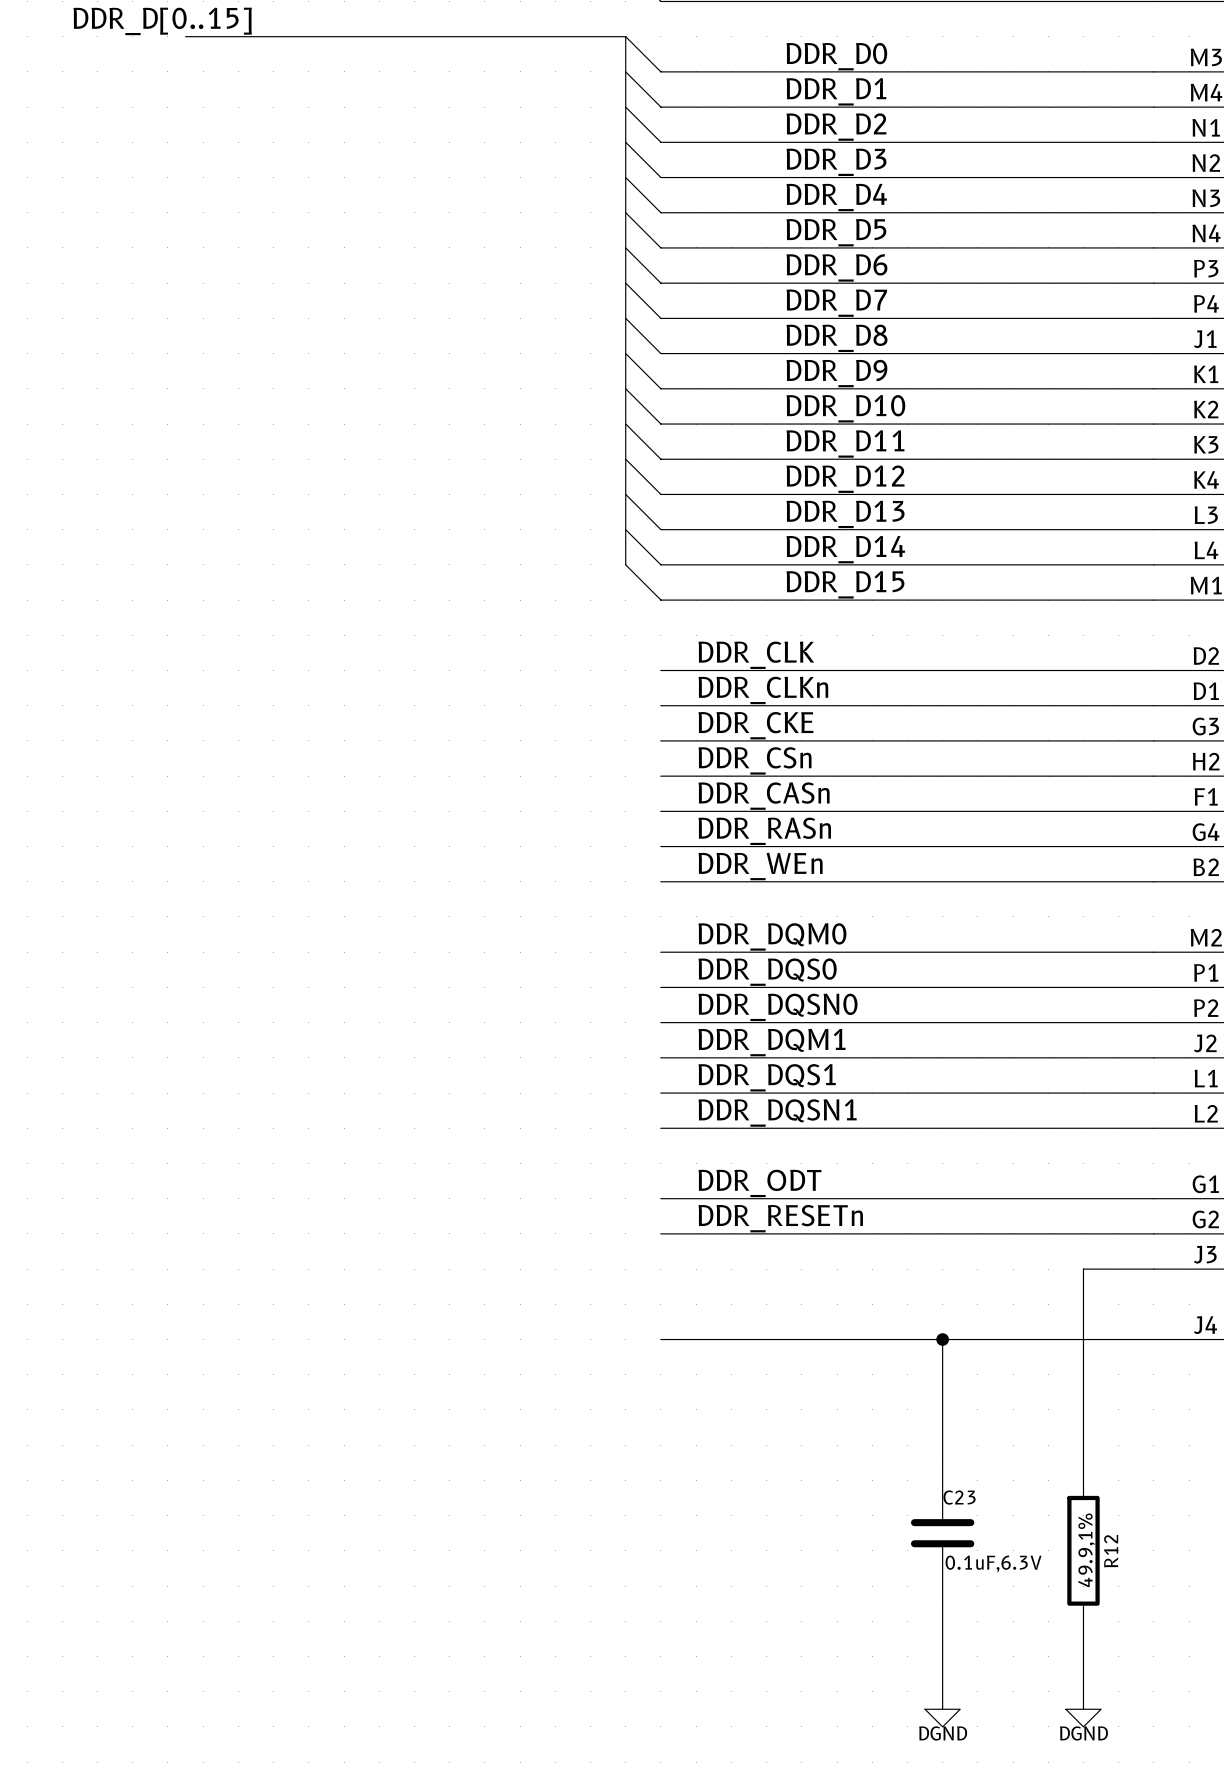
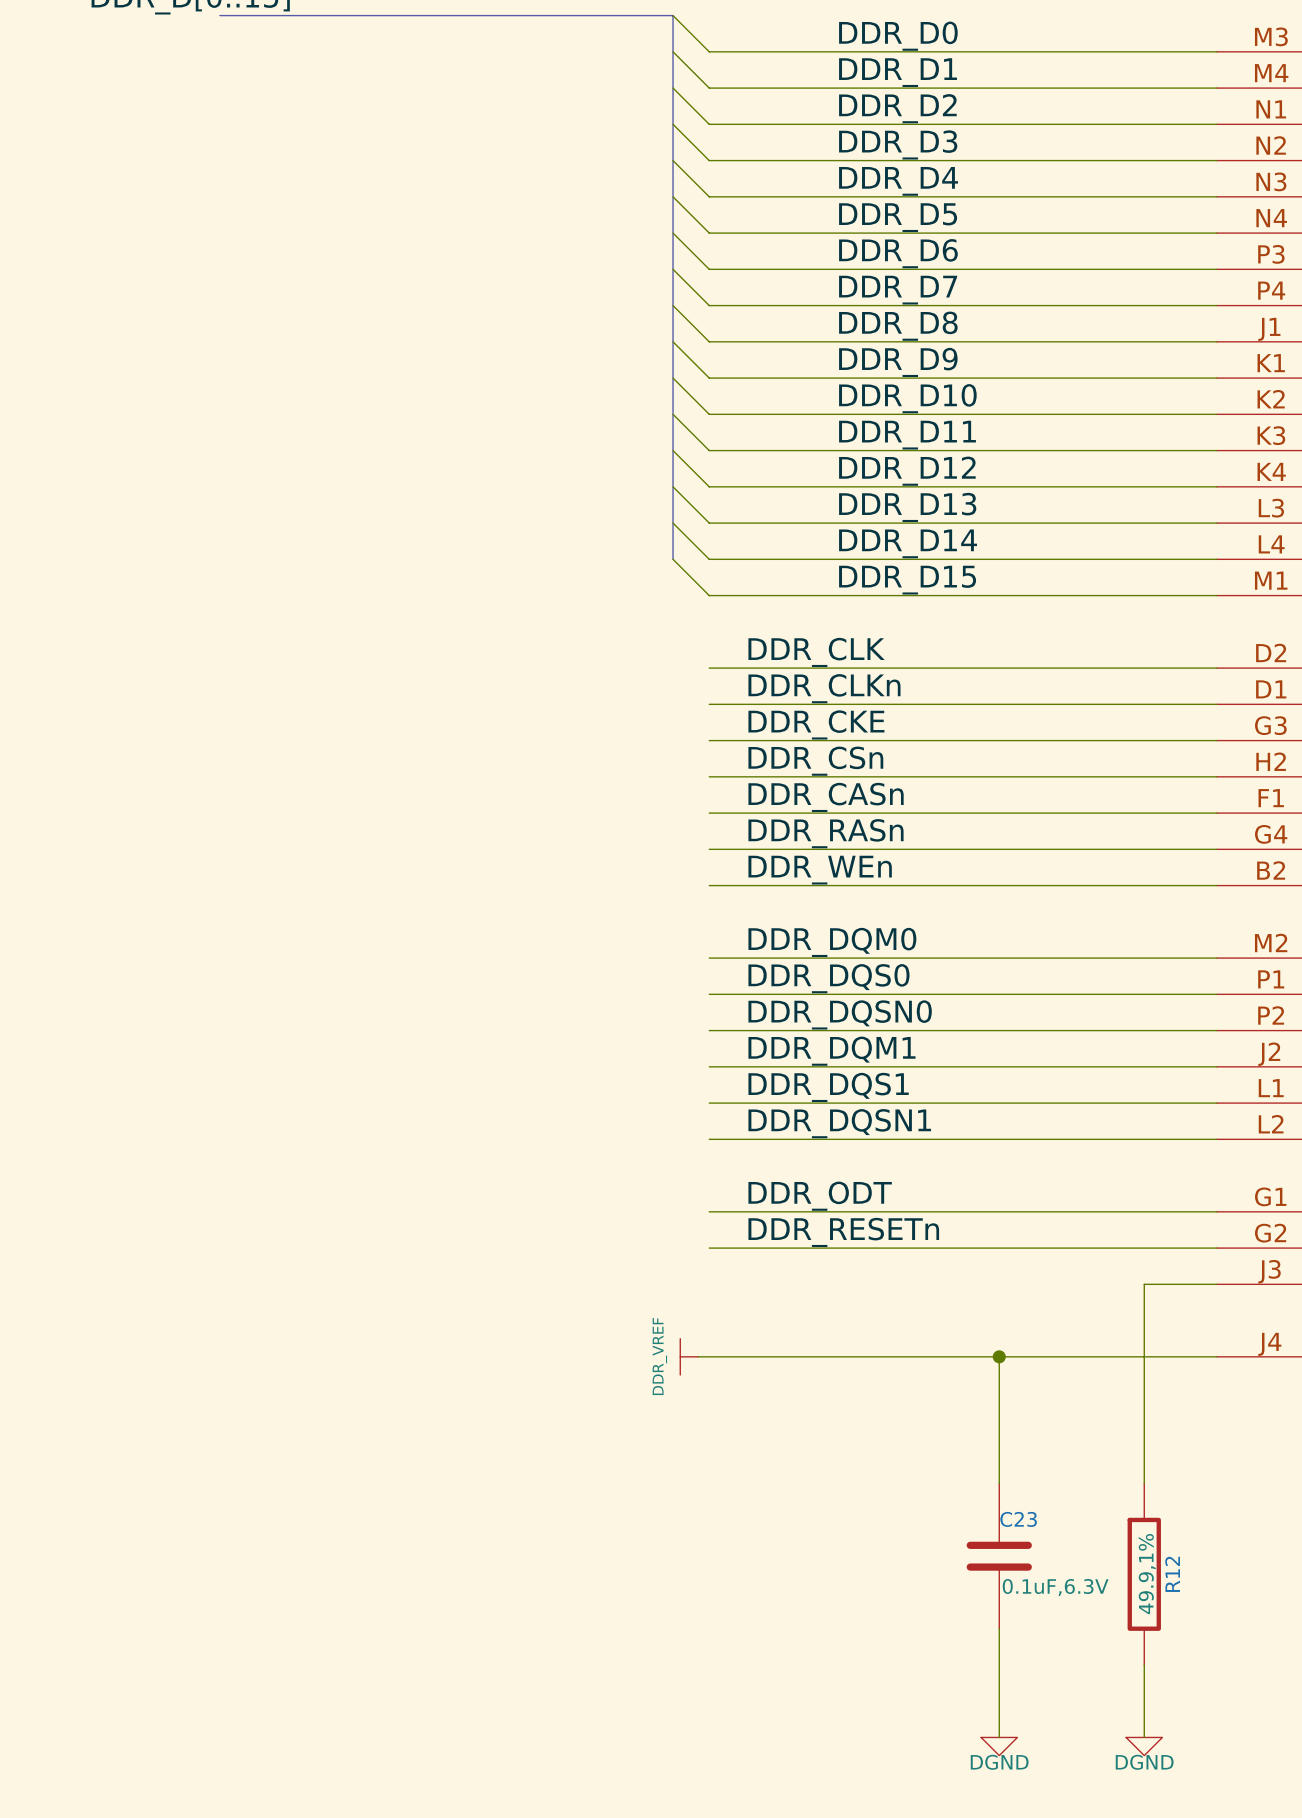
power symbol: none -> DDR_VREF (689, 1356)
wire: none -> (698, 1356) (709, 1356)

